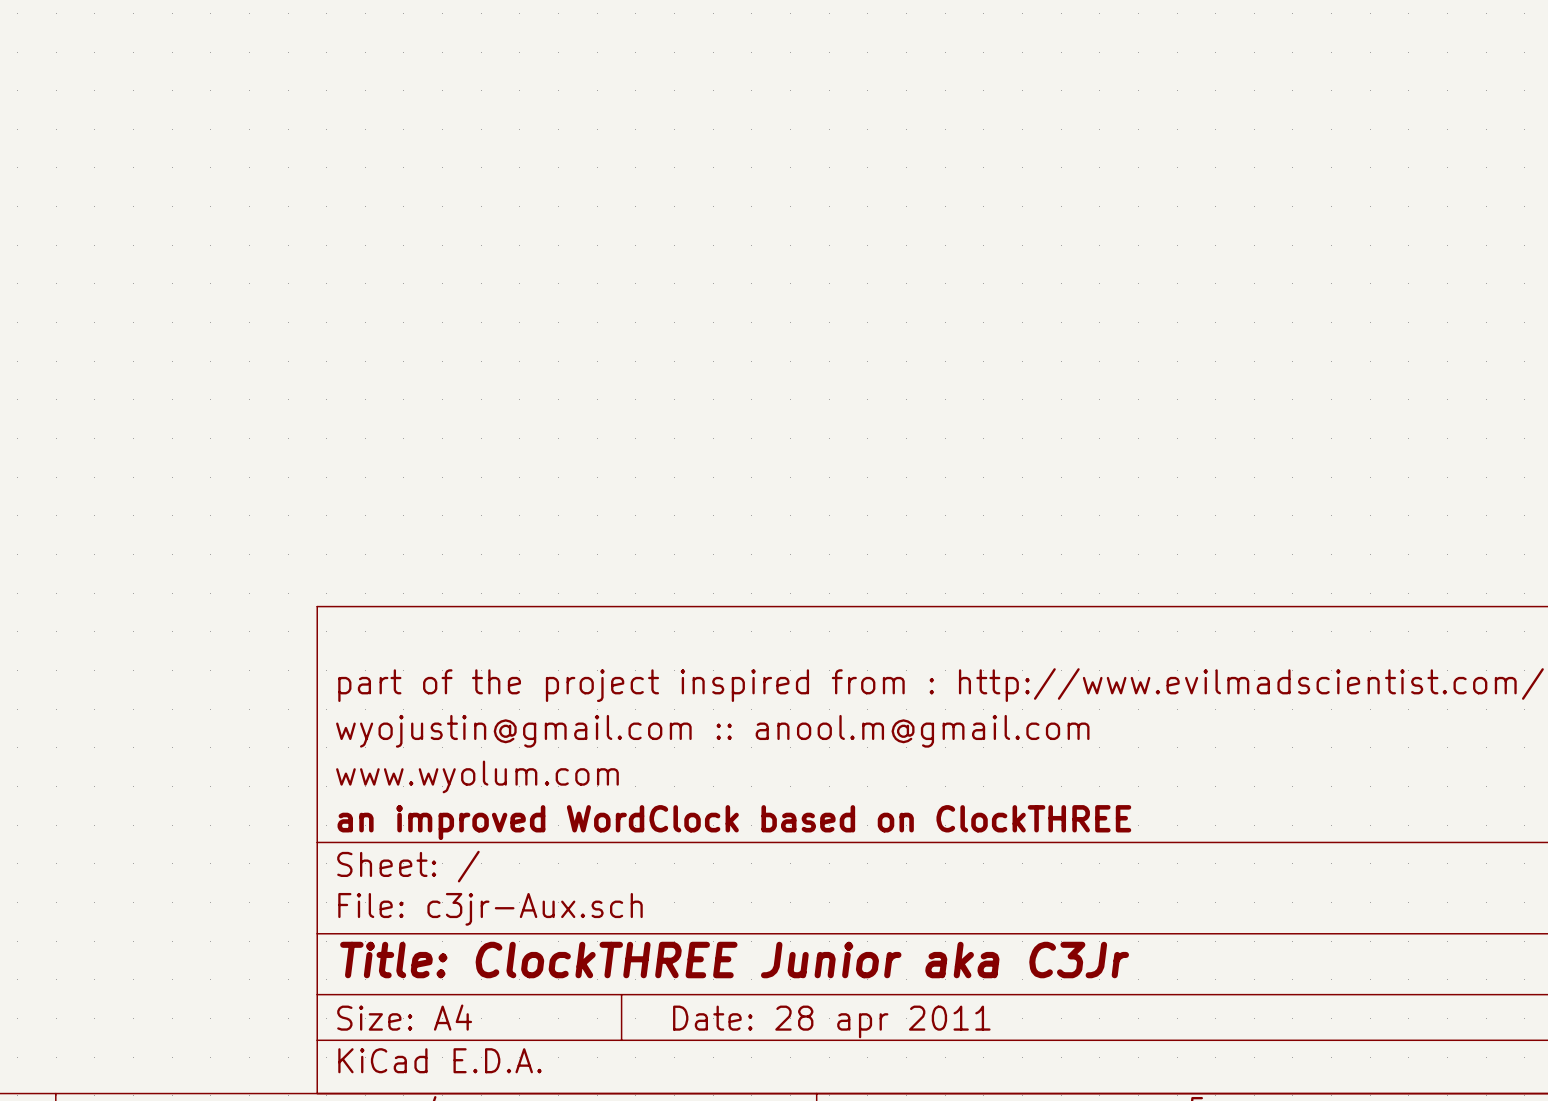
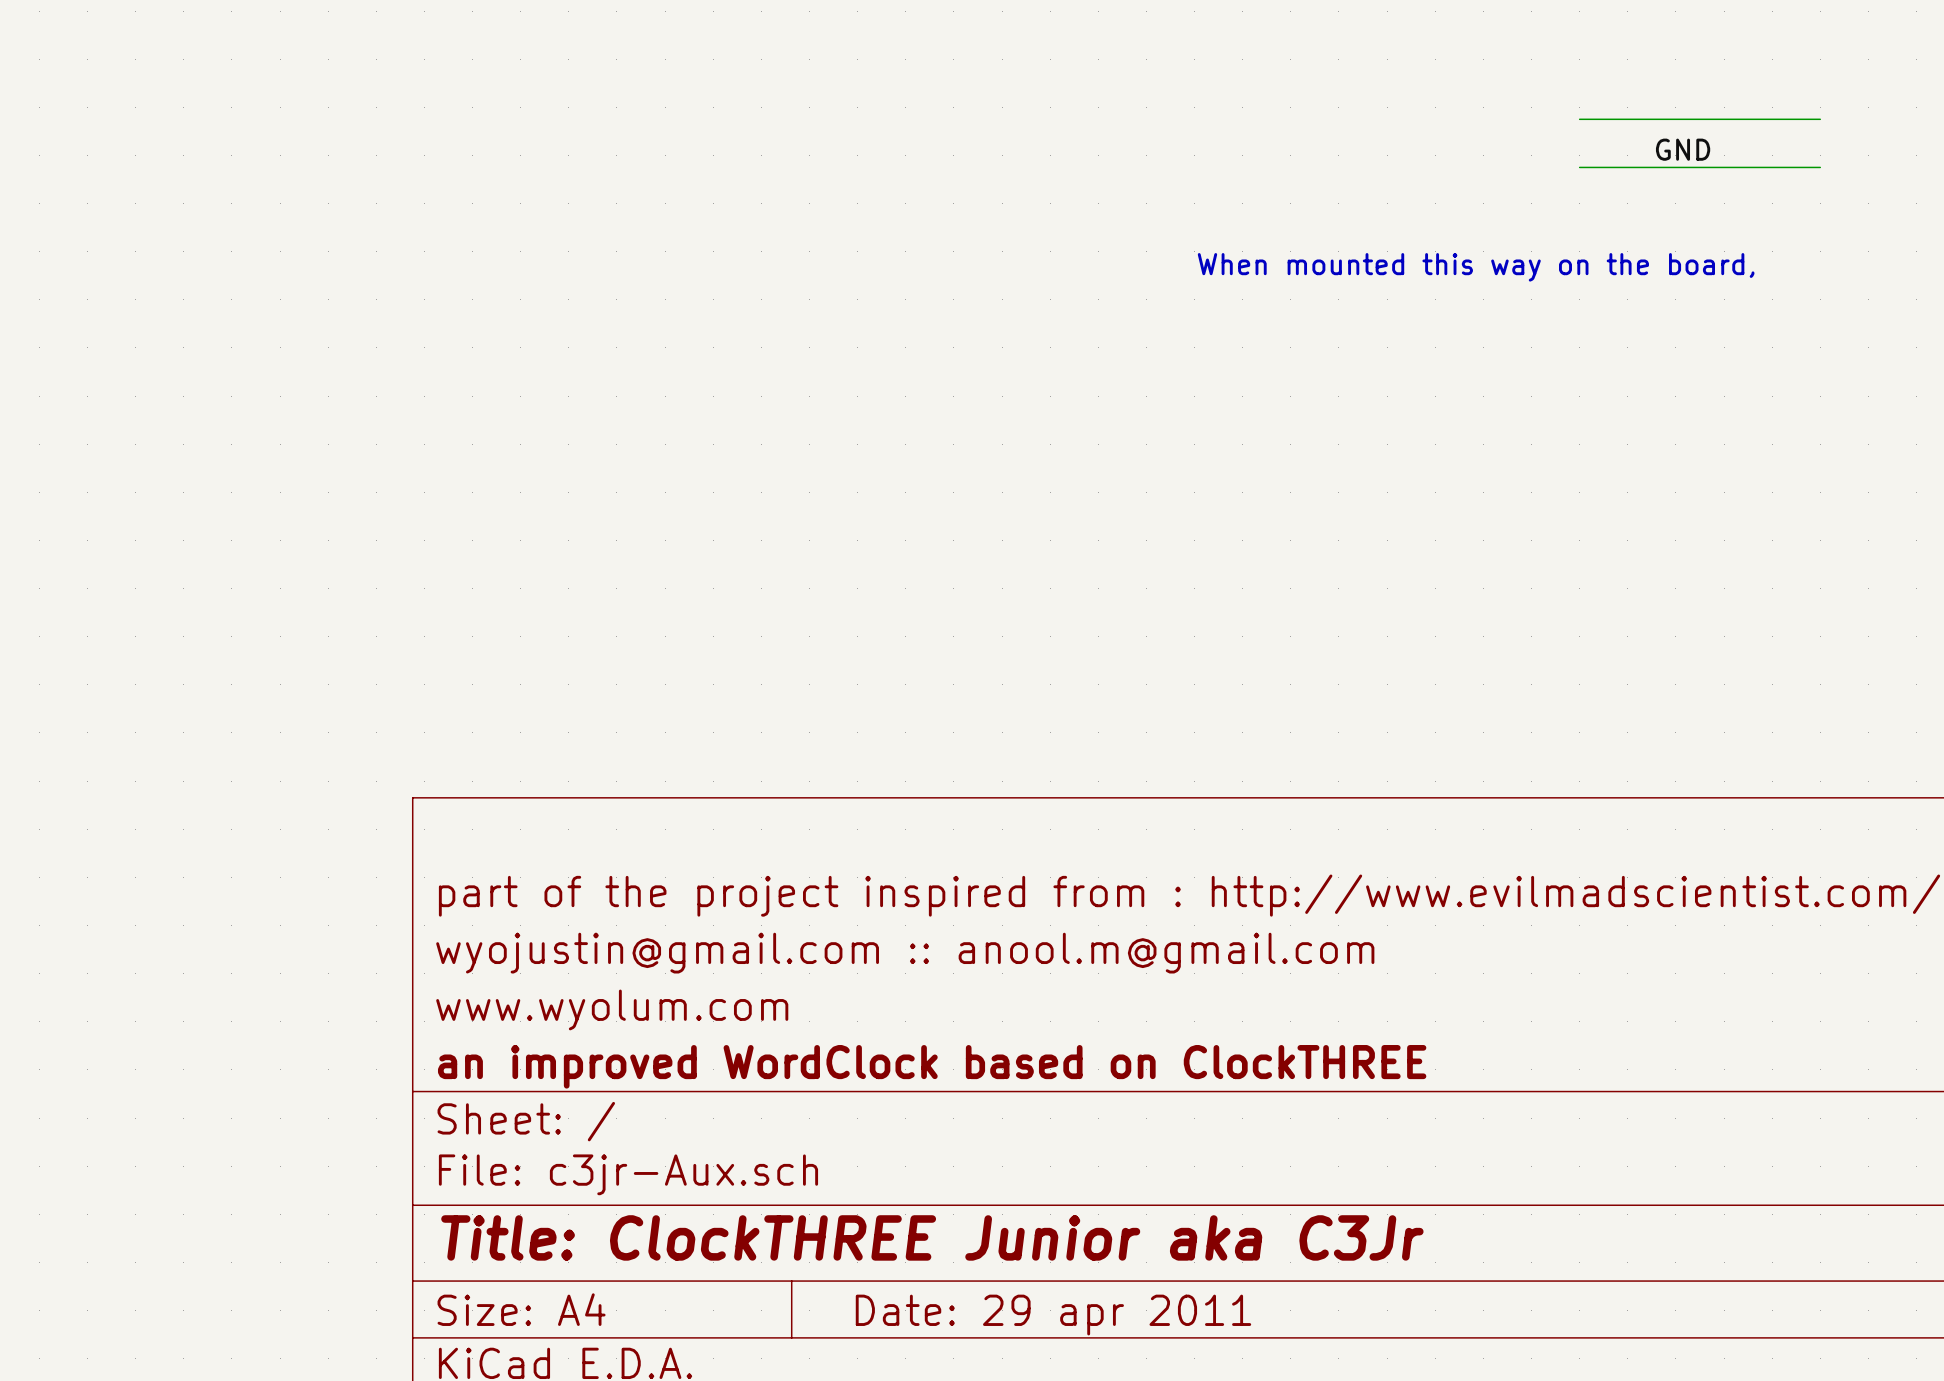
wire: none -> (1579, 119) (1820, 119)
label: none -> GND (1683, 149)
wire: none -> (1579, 167) (1820, 167)
text: none -> When mounted this way on the board, (1476, 267)
title block: Date: 28 apr 2011 (831, 1021) -> Date: 29 apr 2011 (1053, 1315)

